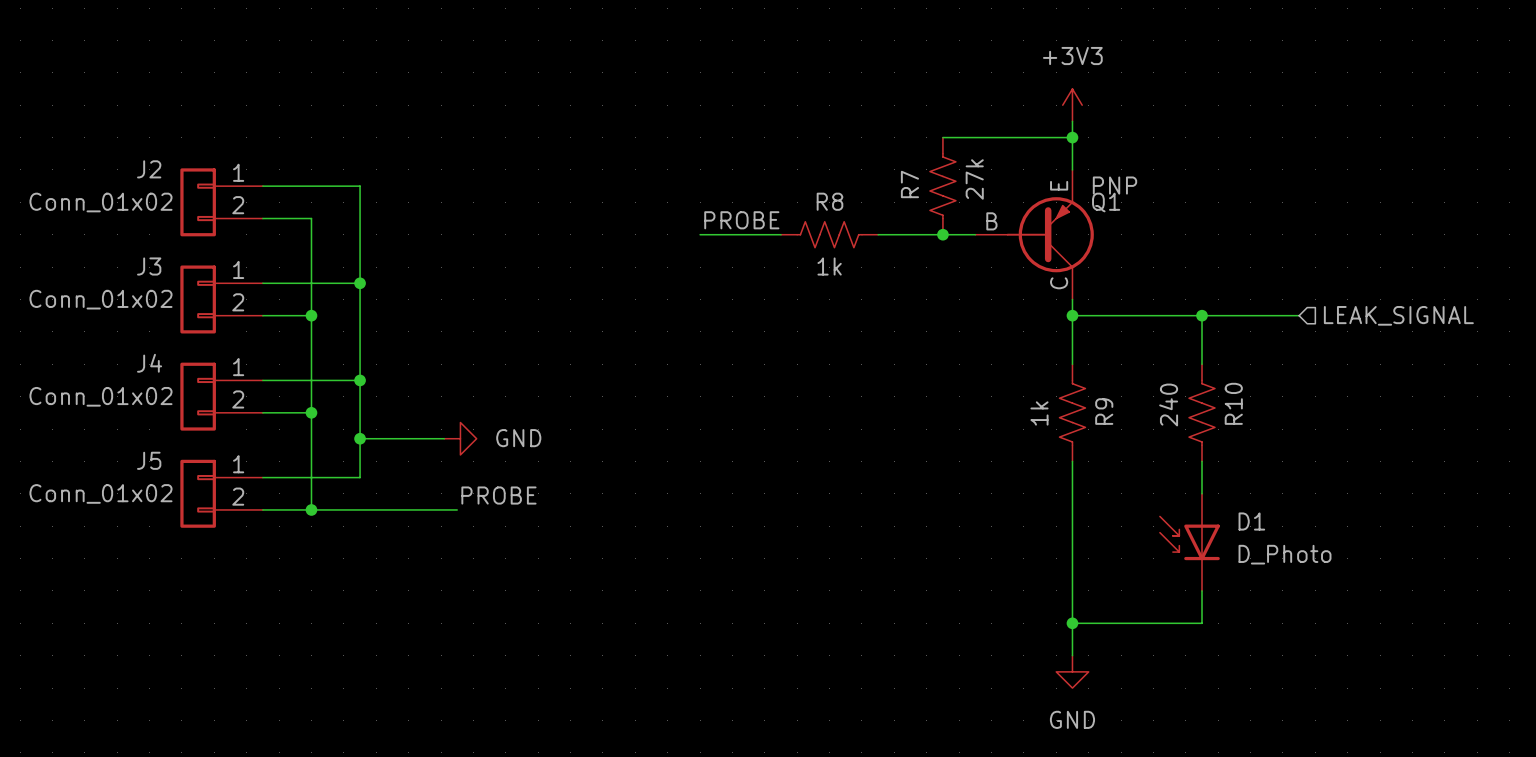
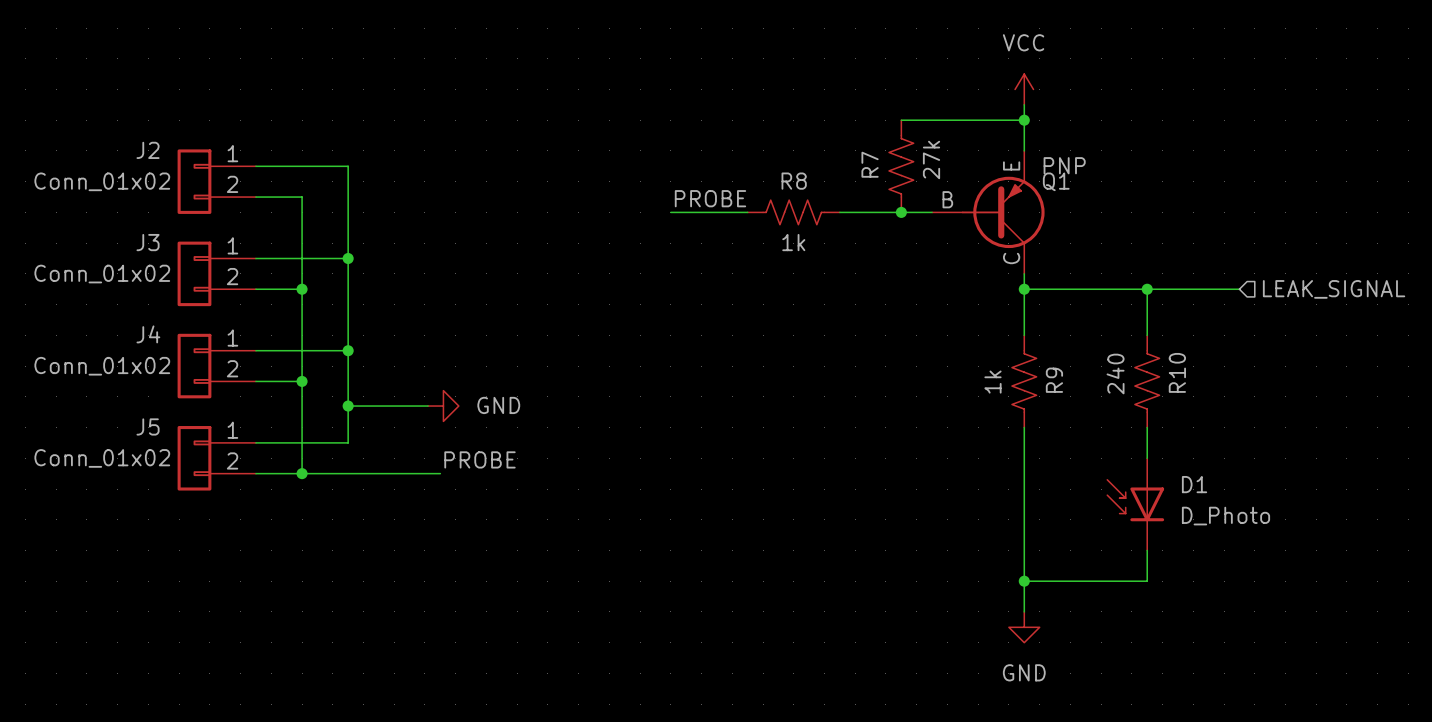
power symbol: +3V3 (1072, 105) -> VCC (1024, 89)

